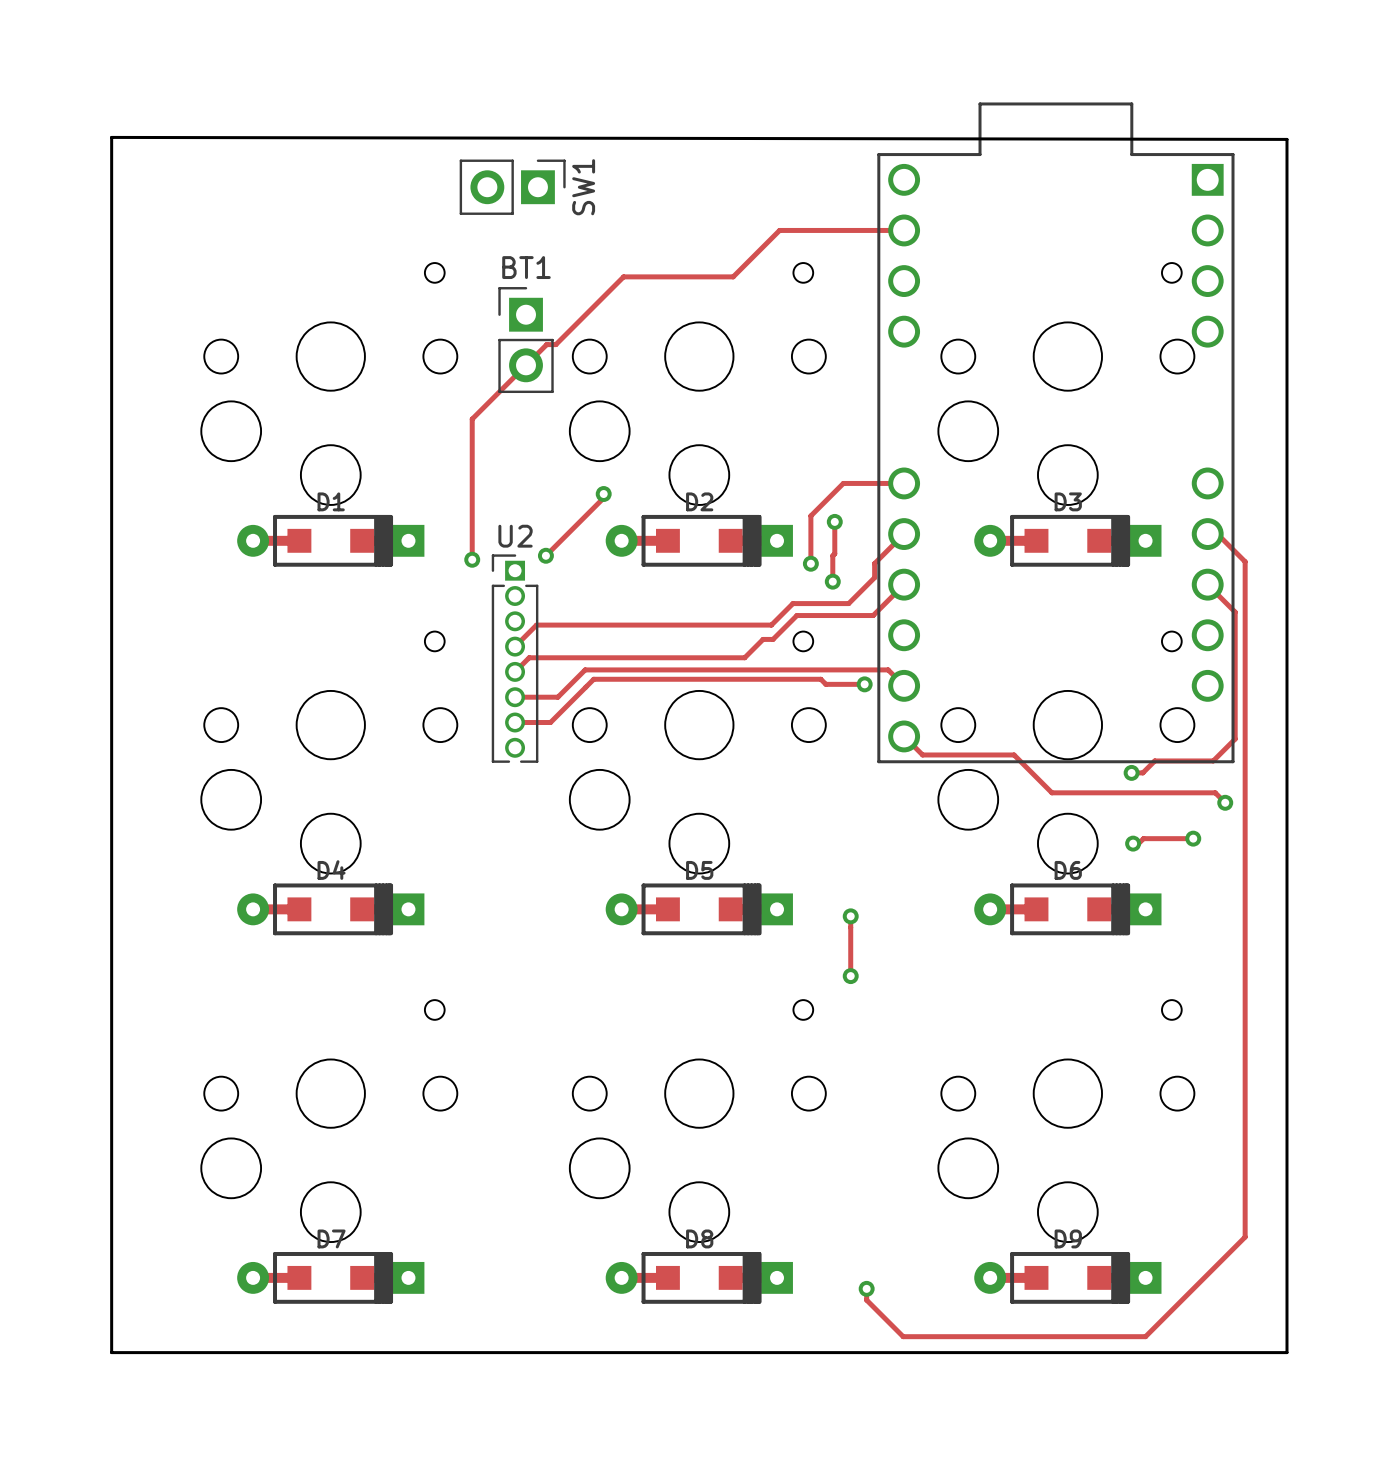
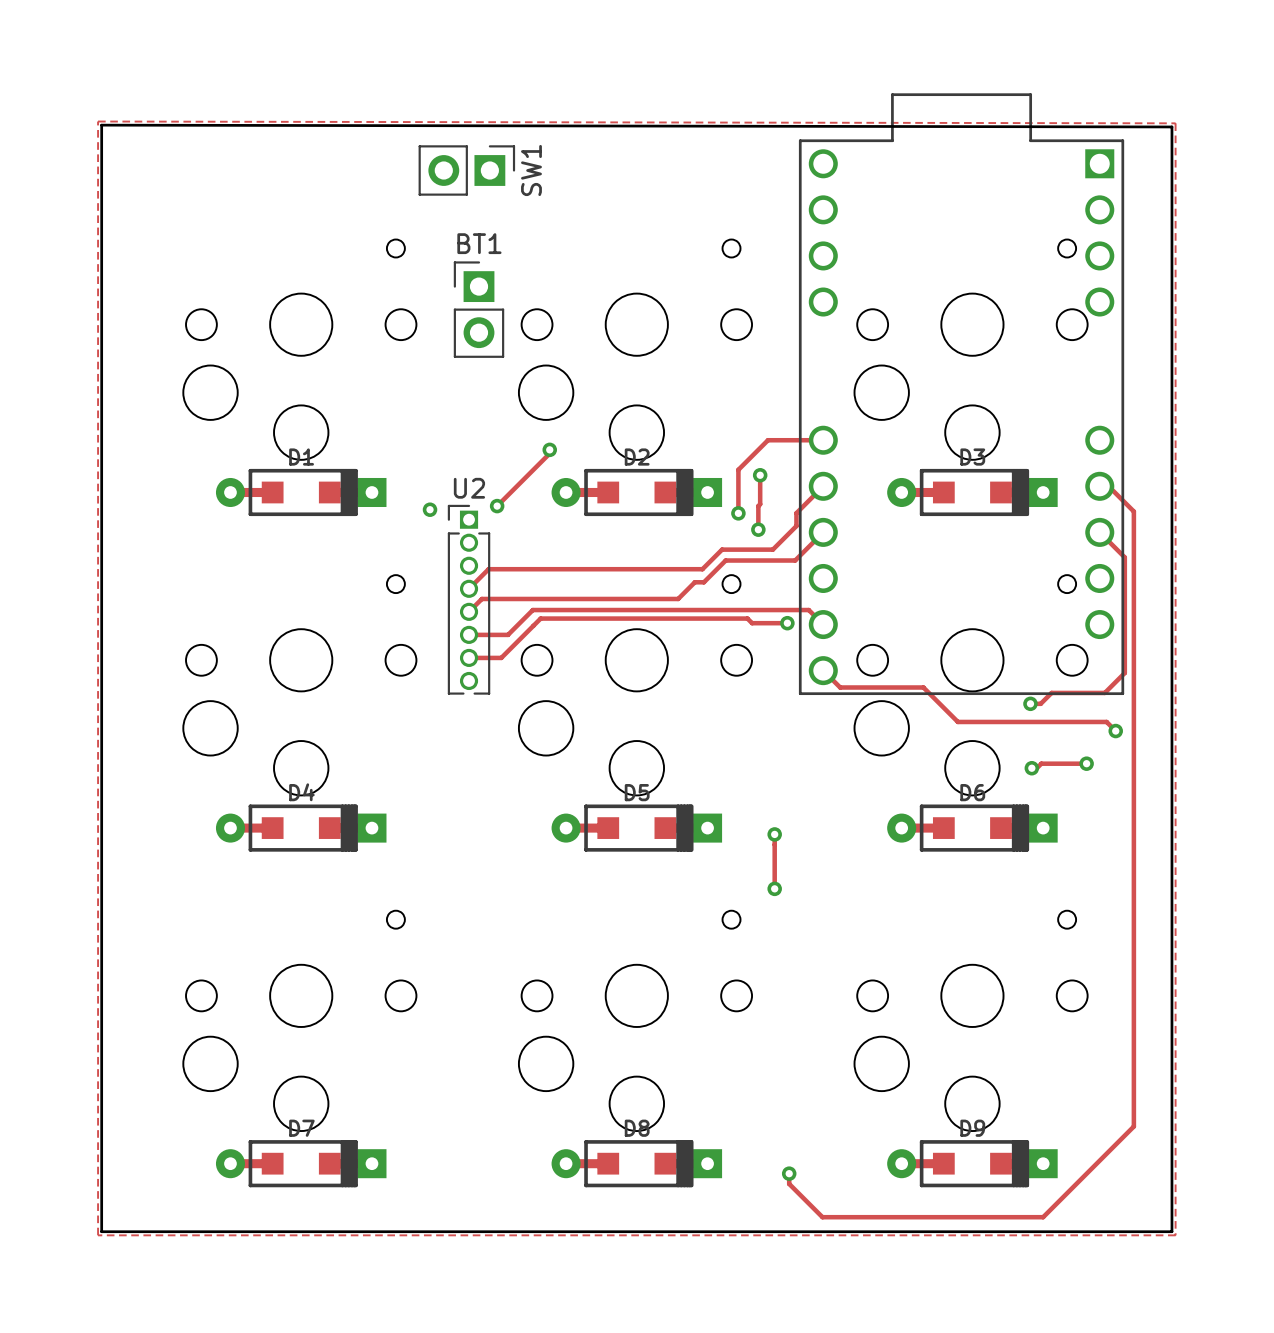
zone outline: none -> (98, 121) (98, 1235) (1175, 1235) (1175, 123) (98, 121)
track: (904, 230) (779, 230) (733, 276) (623, 276) (555, 344) (546, 344) (472, 419) (472, 559) -> none

